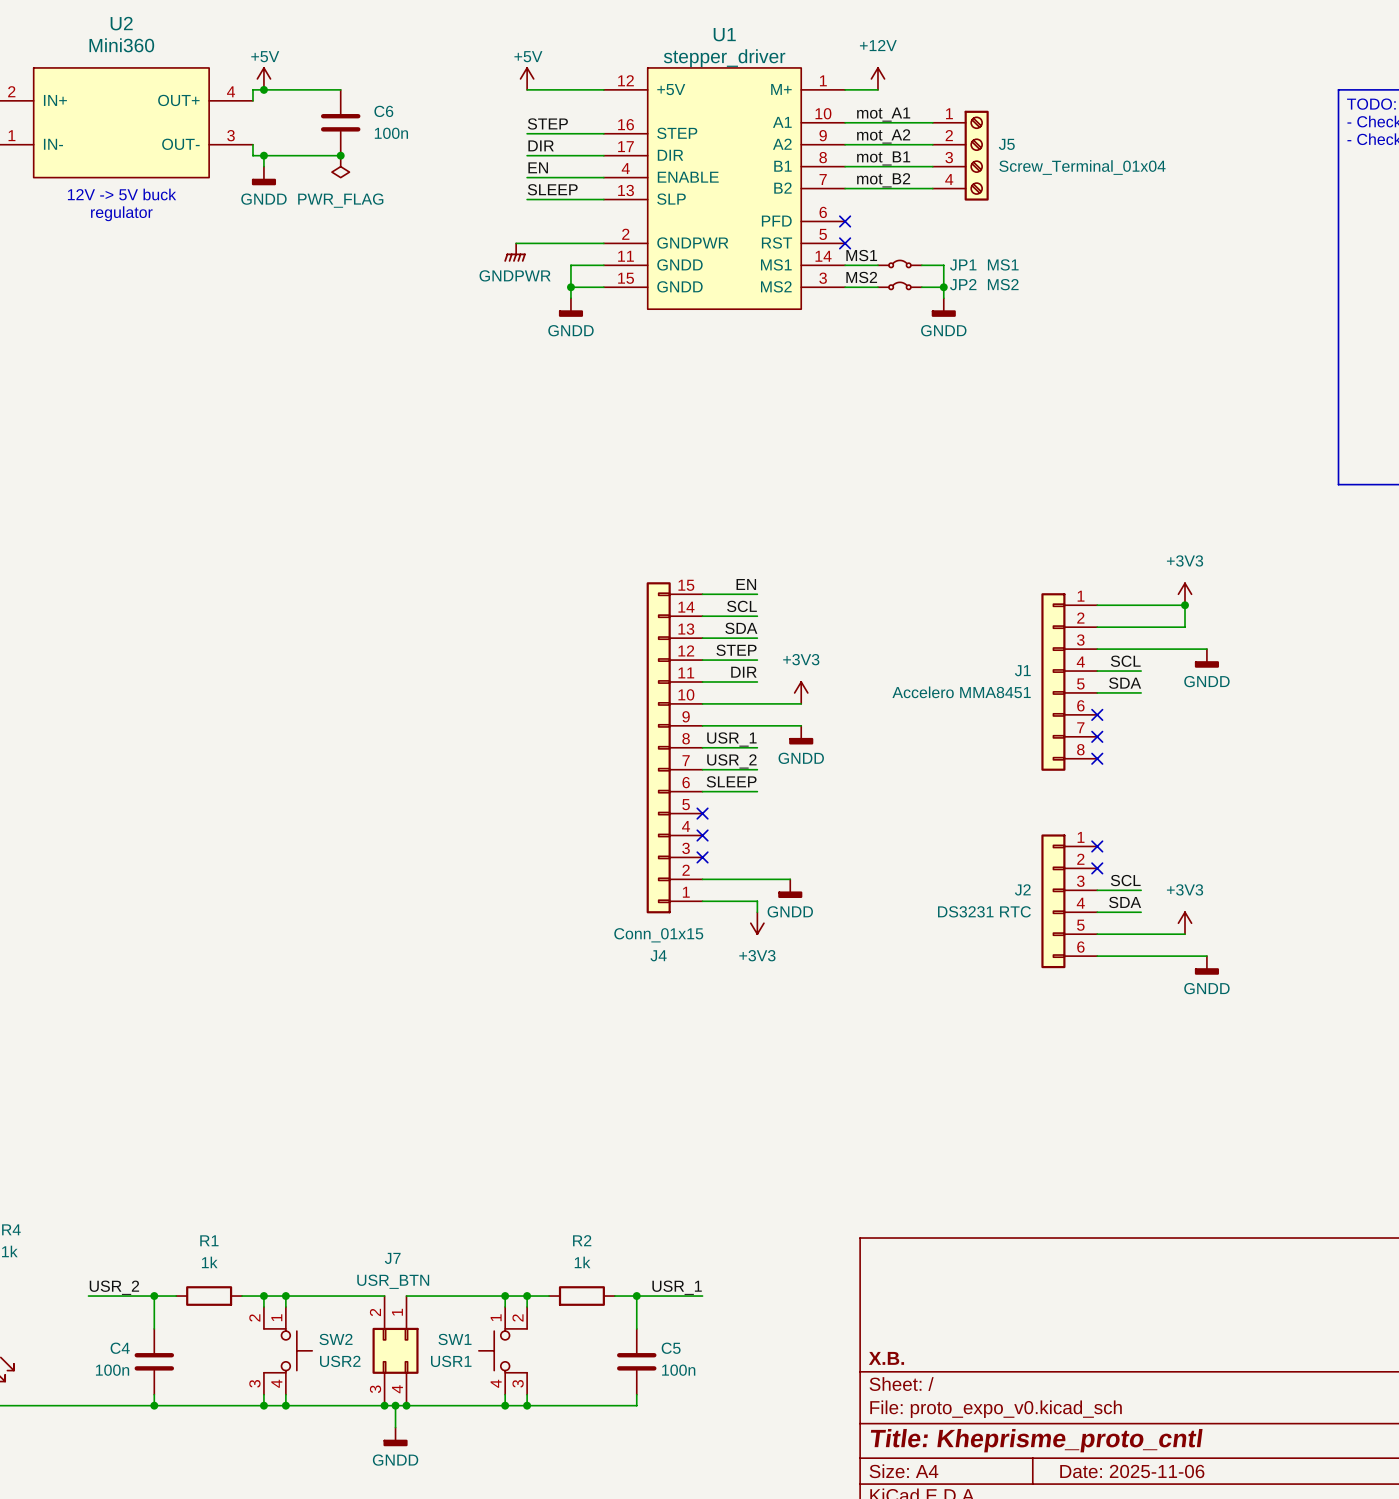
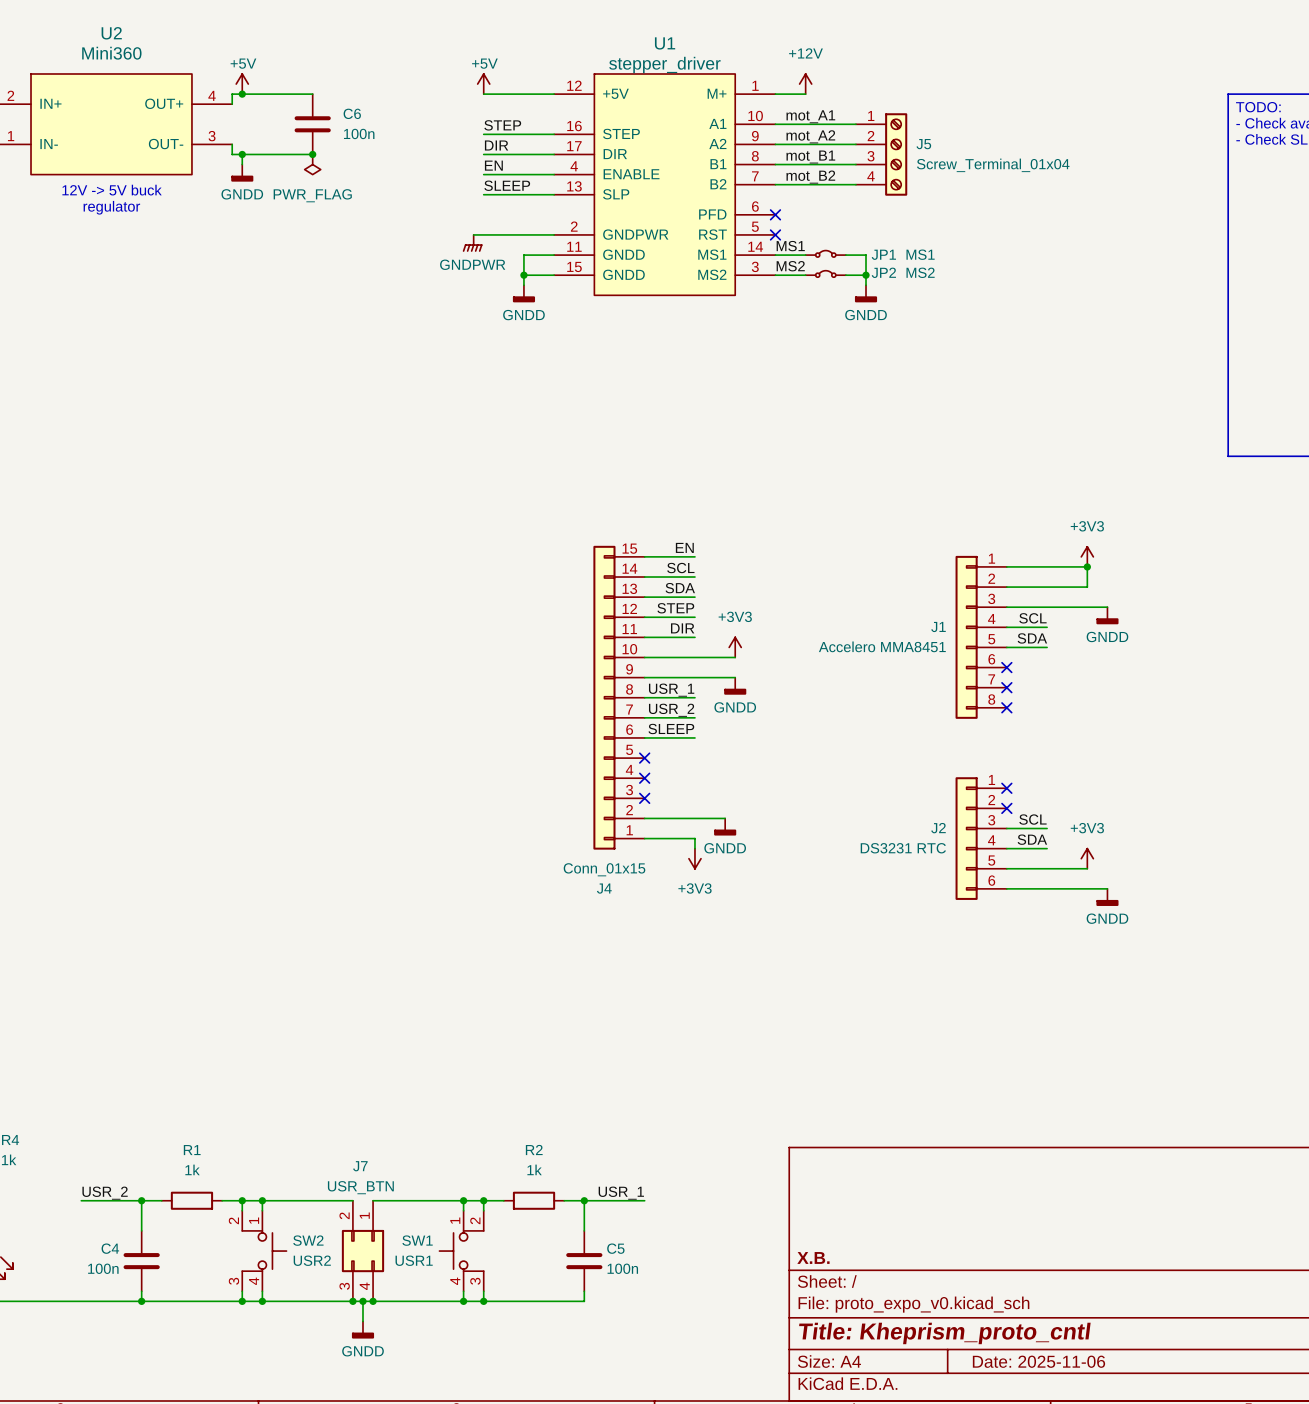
title block: Title: Kheprisme_proto_cntl (1036, 1440) -> Title: Kheprism_proto_cntl (944, 1333)

